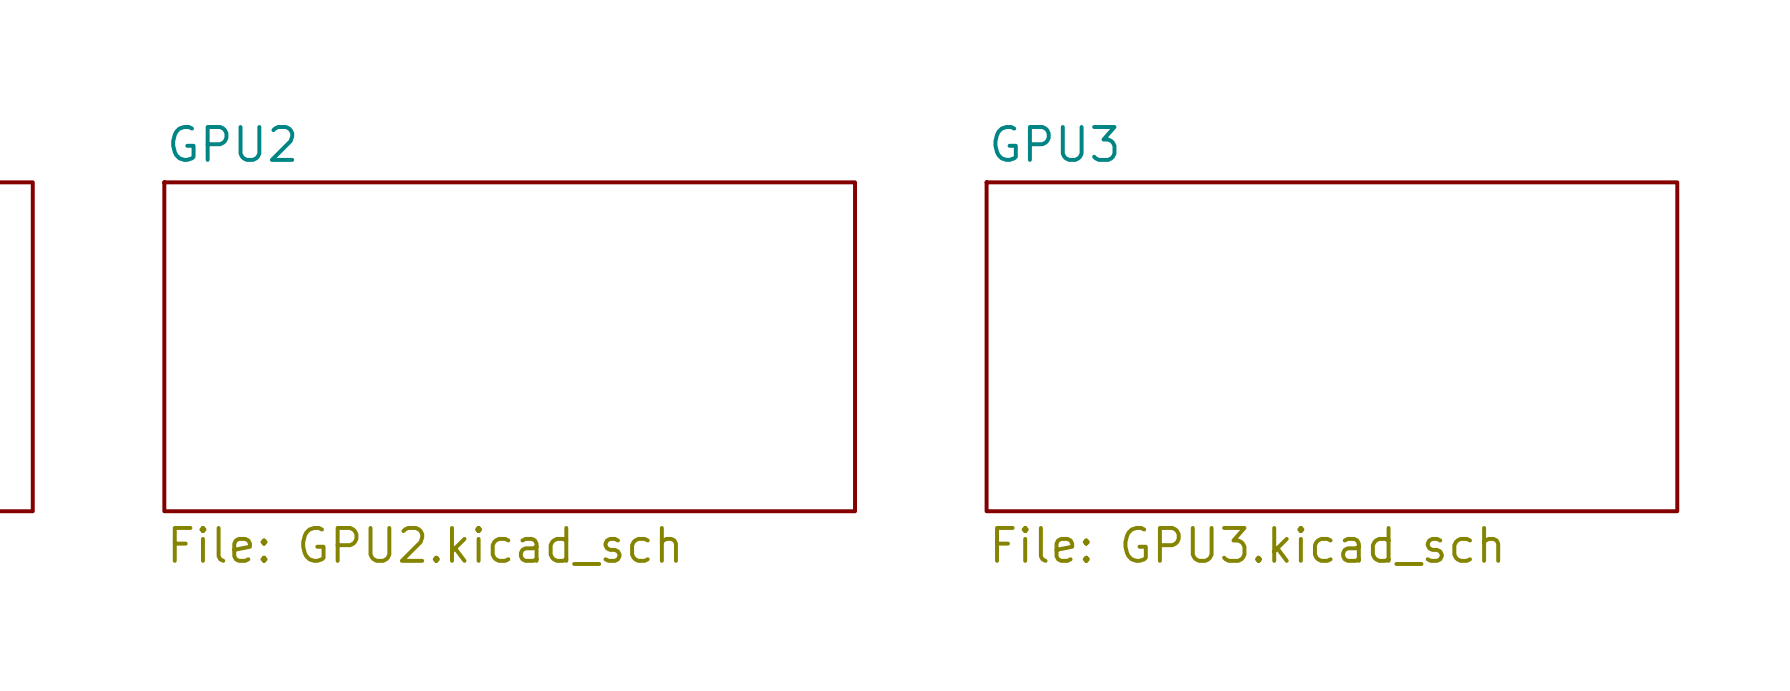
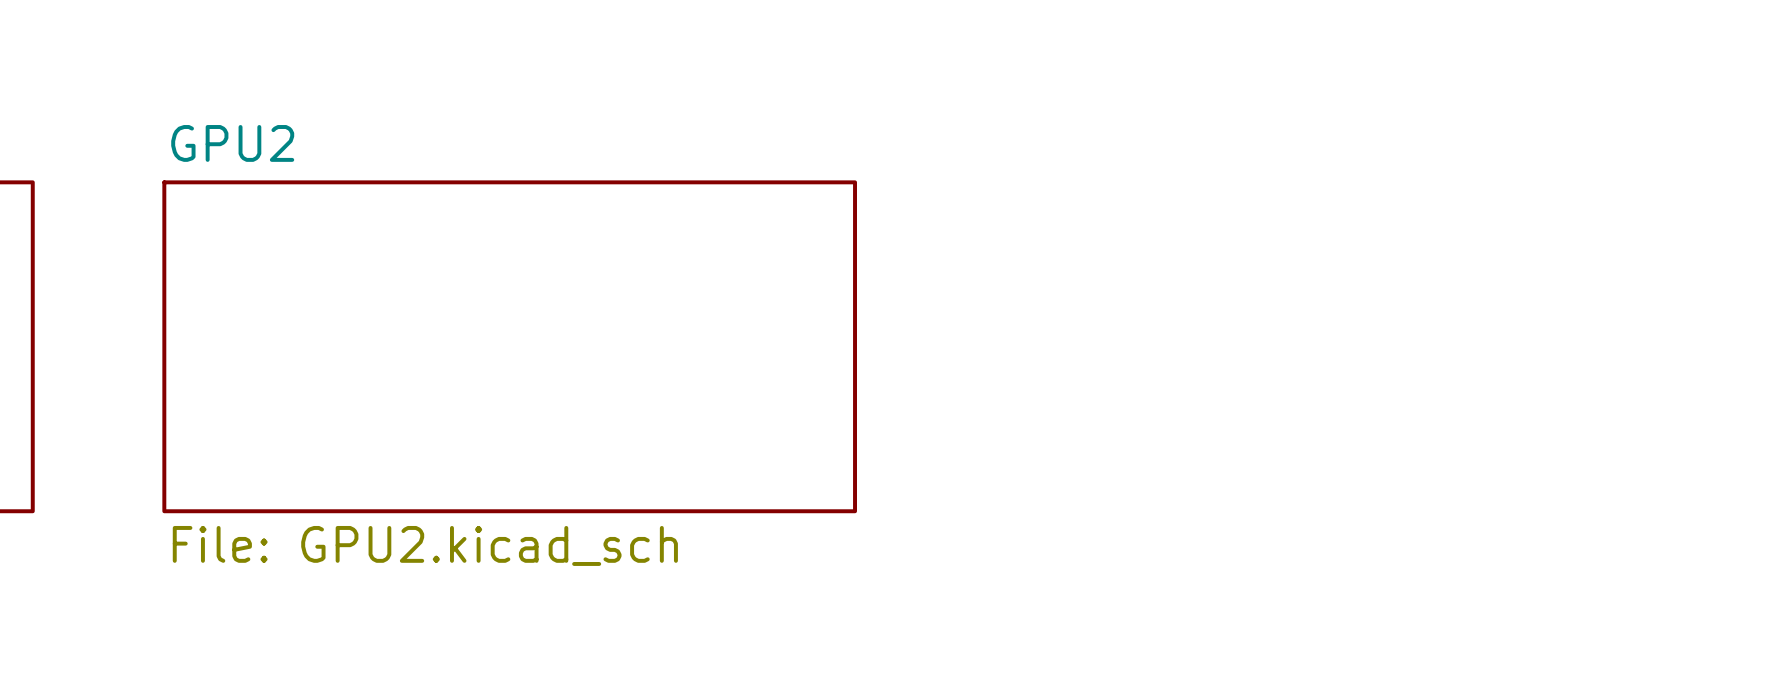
sheet GPU3: File: GPU3.kicad_sch (1331, 346) -> none

